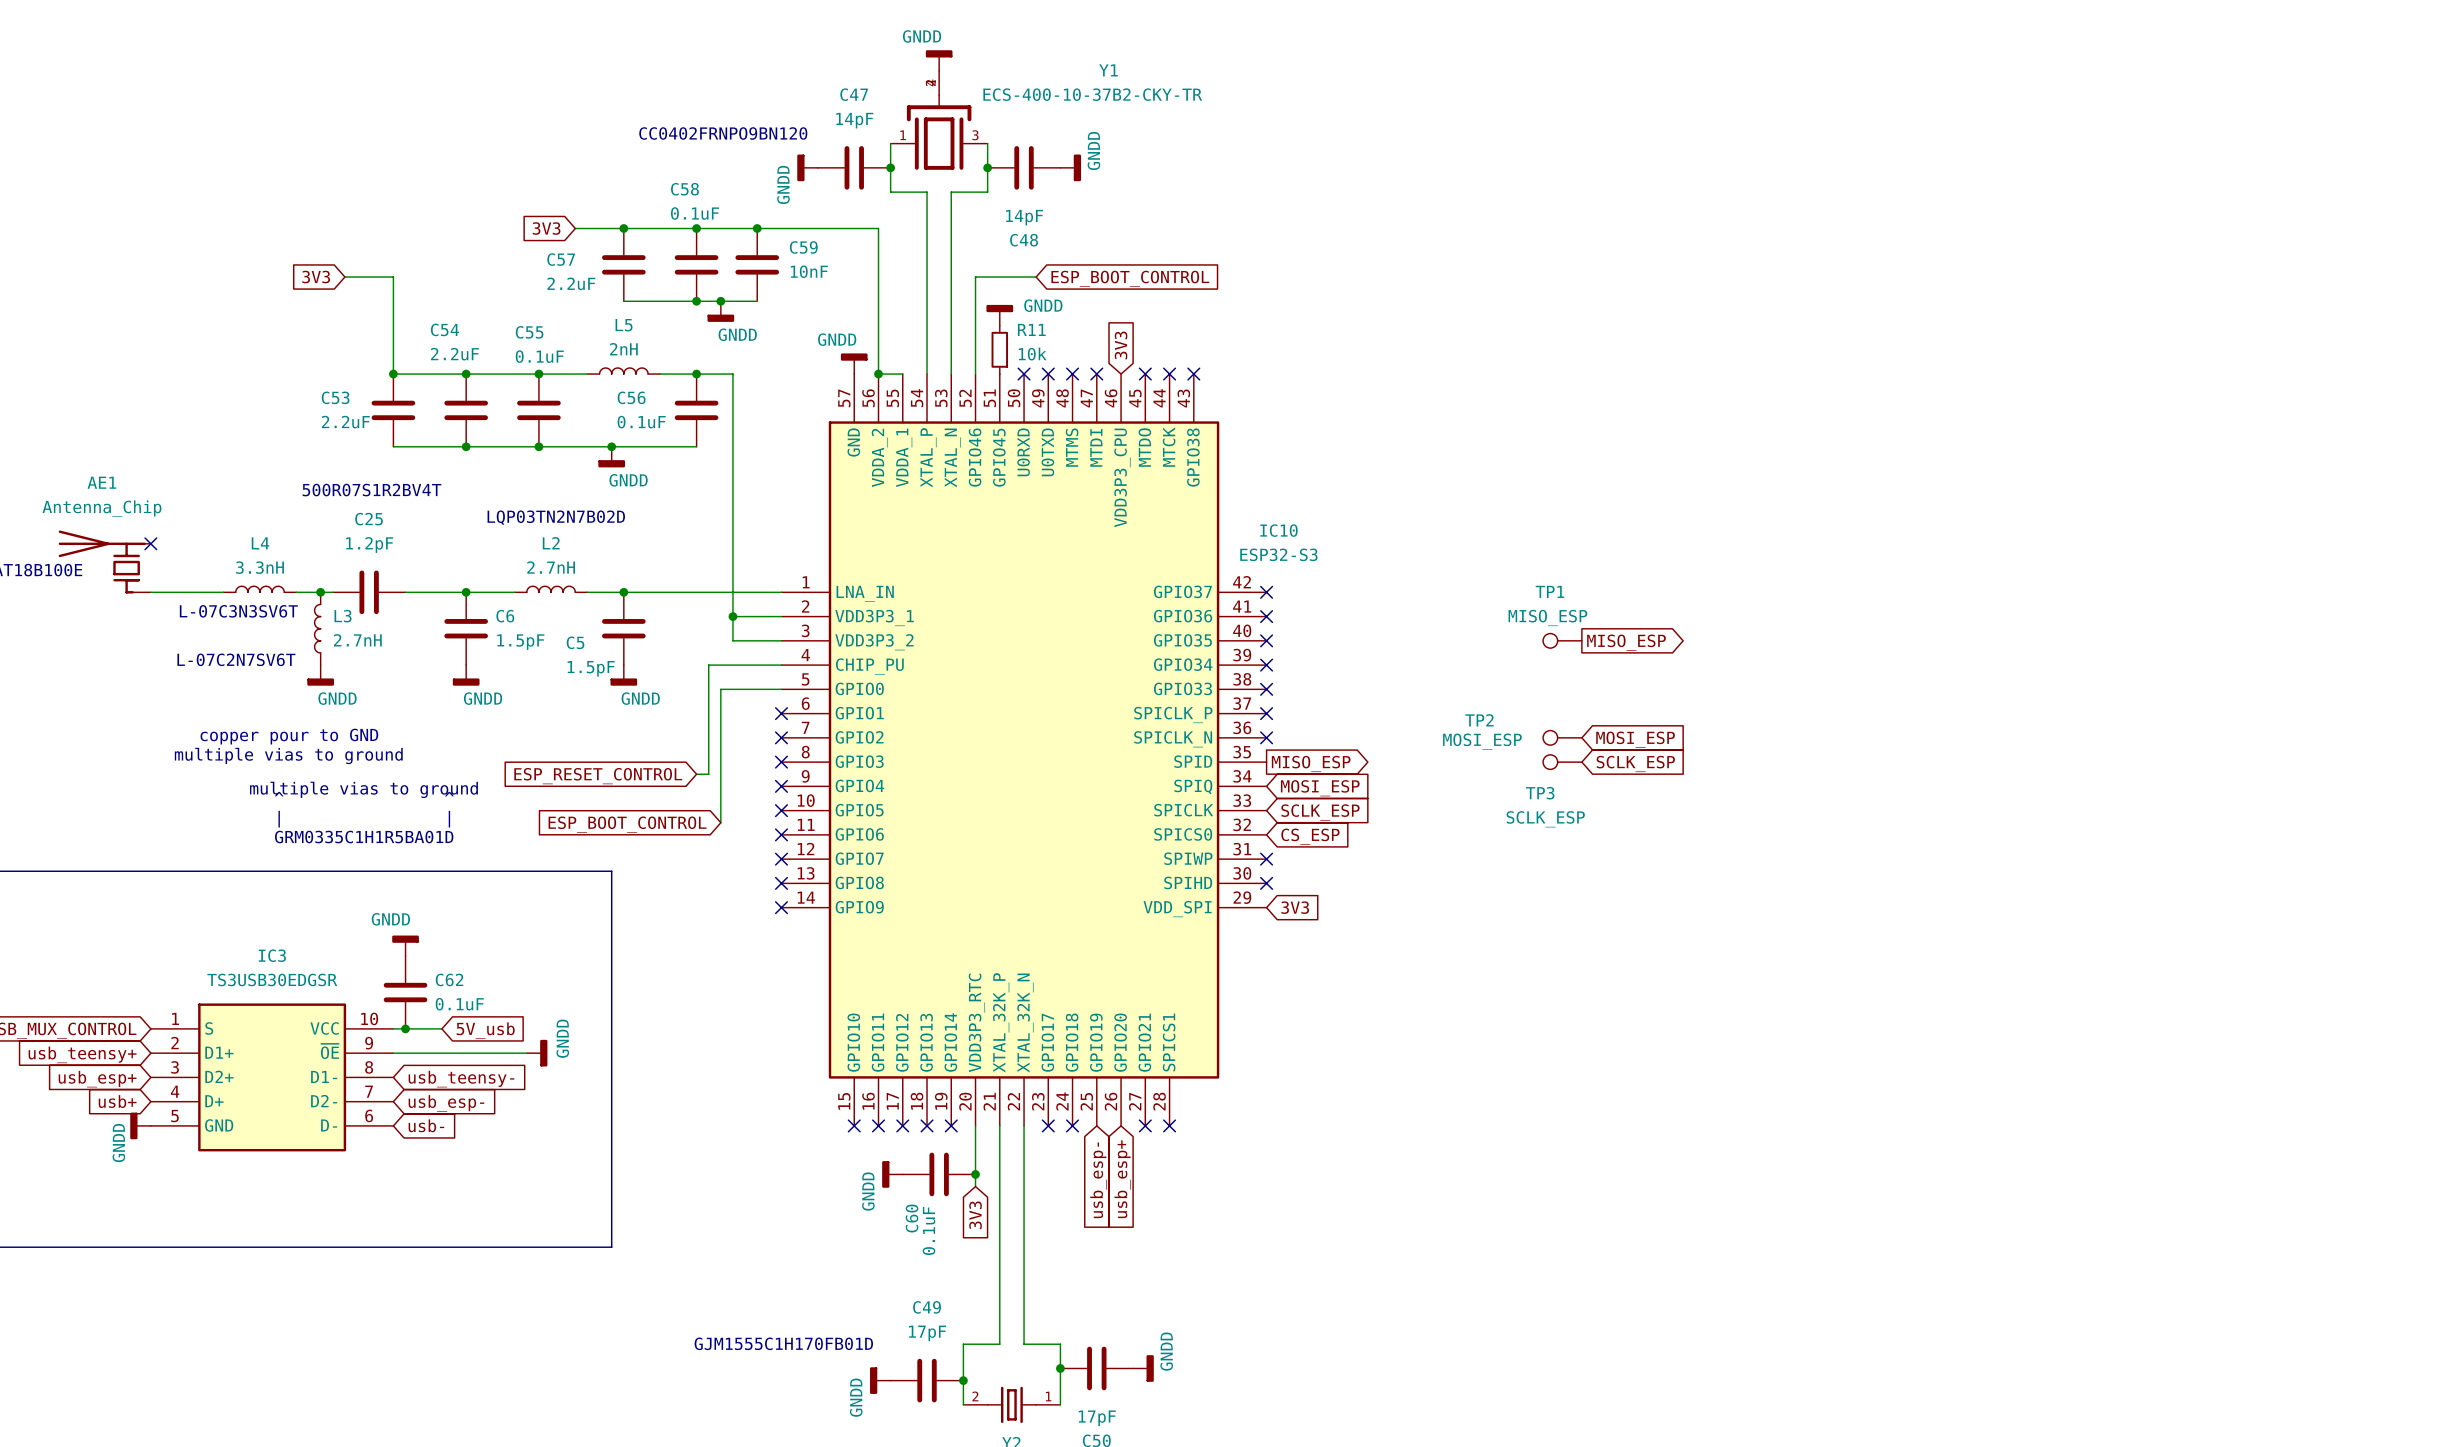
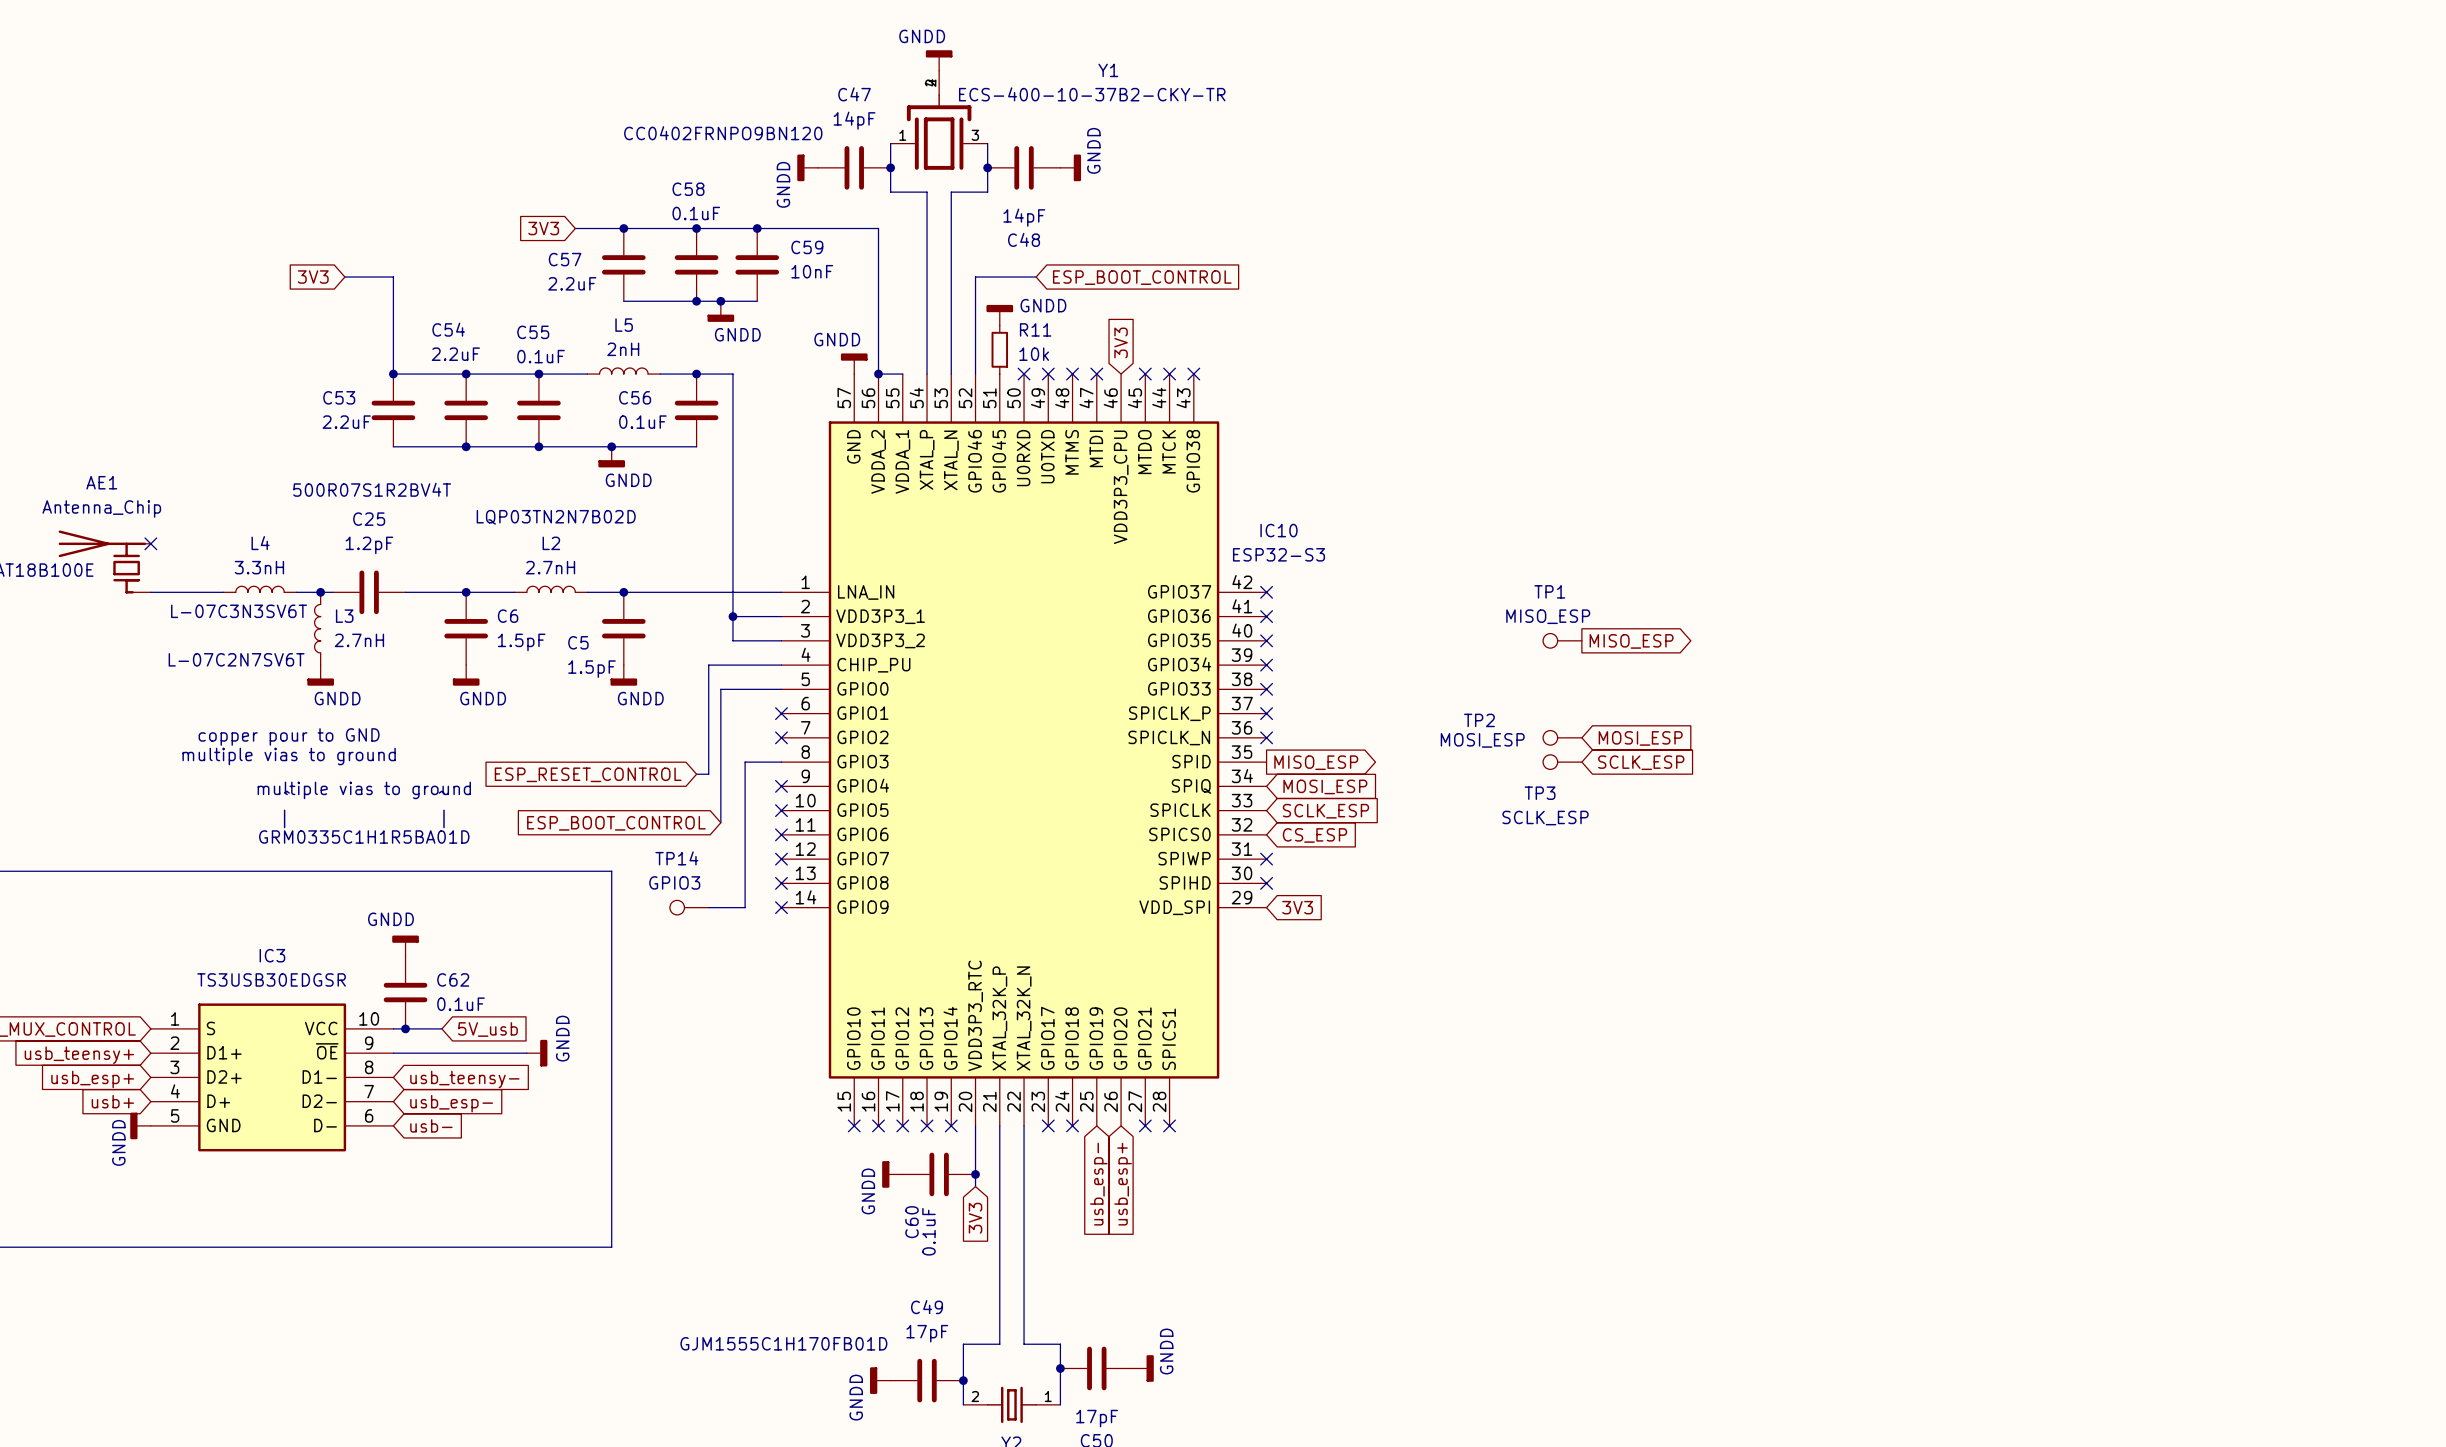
wire: none -> (781, 762) (745, 762) (745, 907) (708, 907)
no-connect mark: (781, 762) -> none
TP14: none -> GPIO3 (689, 907)

